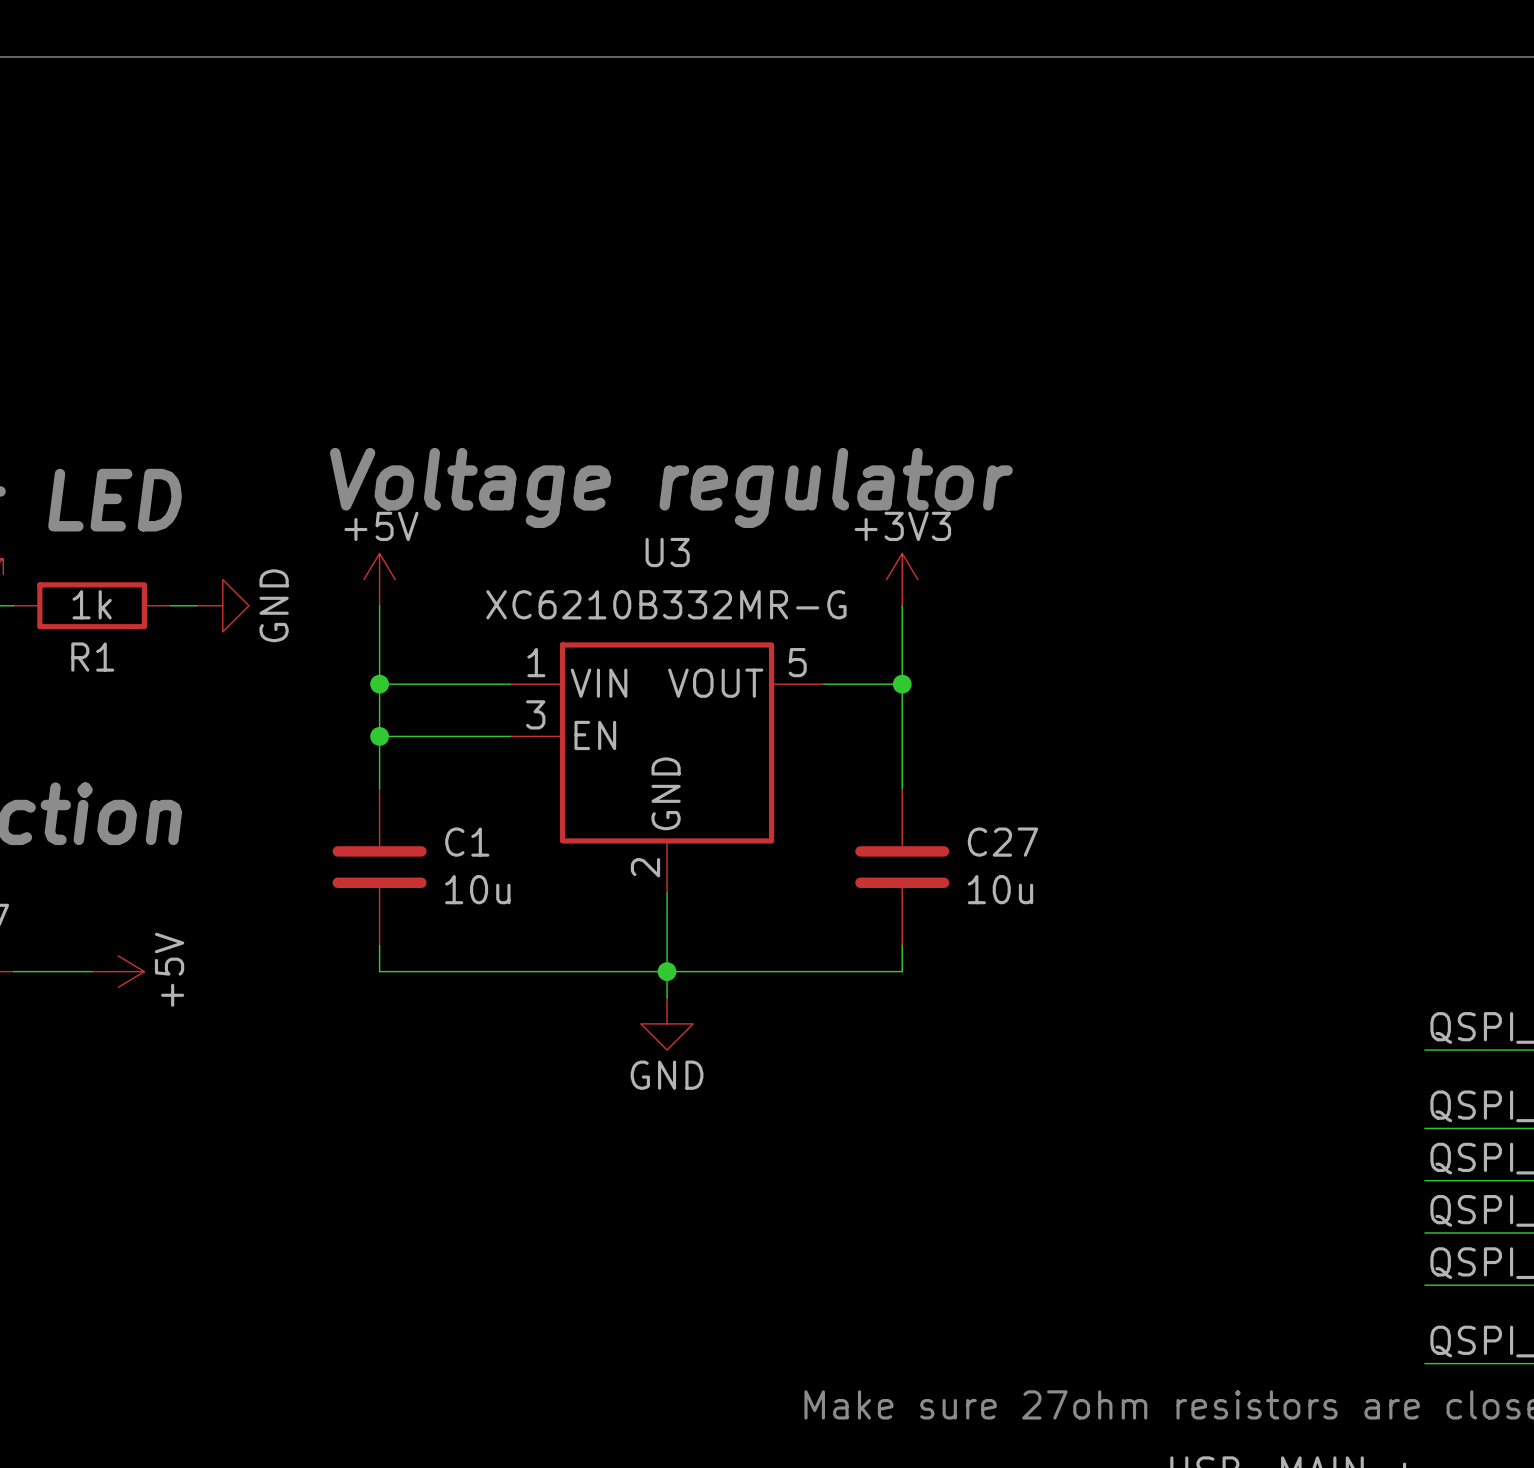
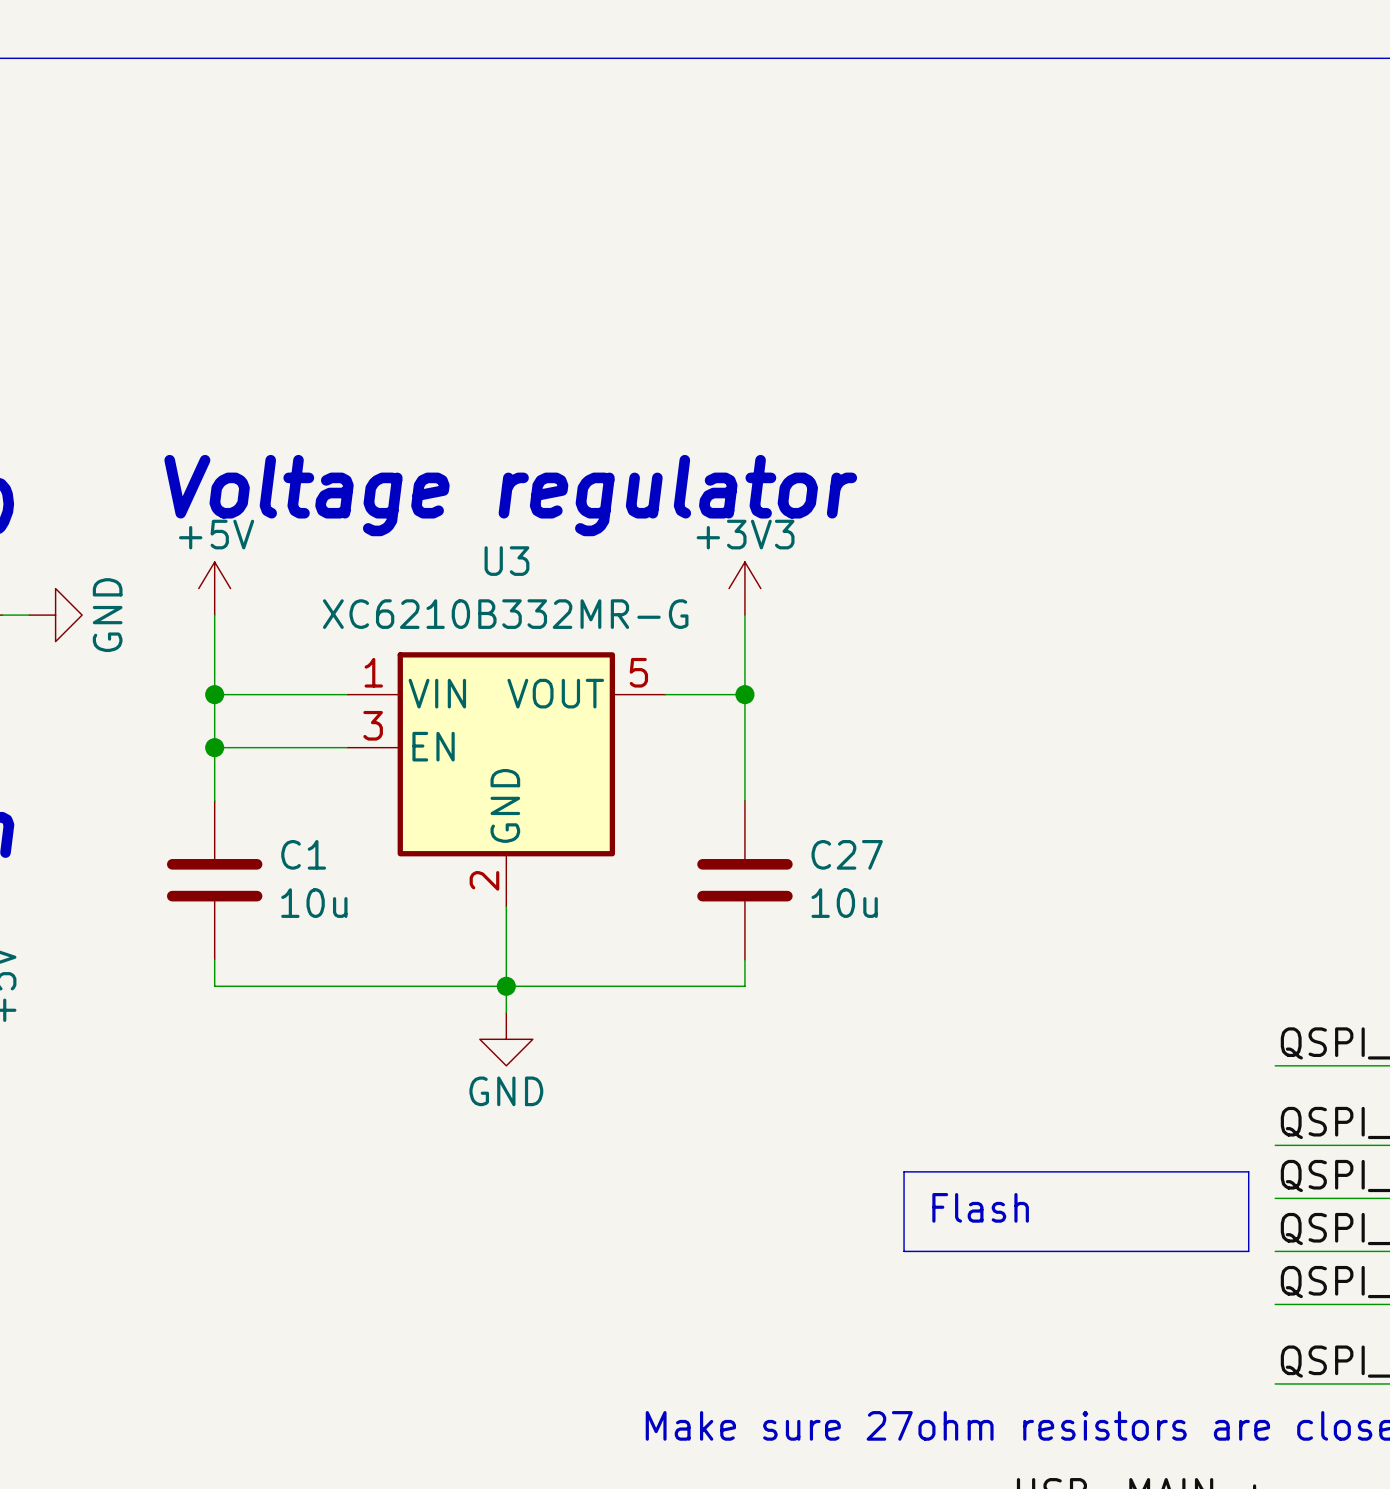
line: none -> (904, 1171) (1248, 1171) (1248, 1251) (904, 1251) (904, 1171)
text: none -> Flash (980, 1207)

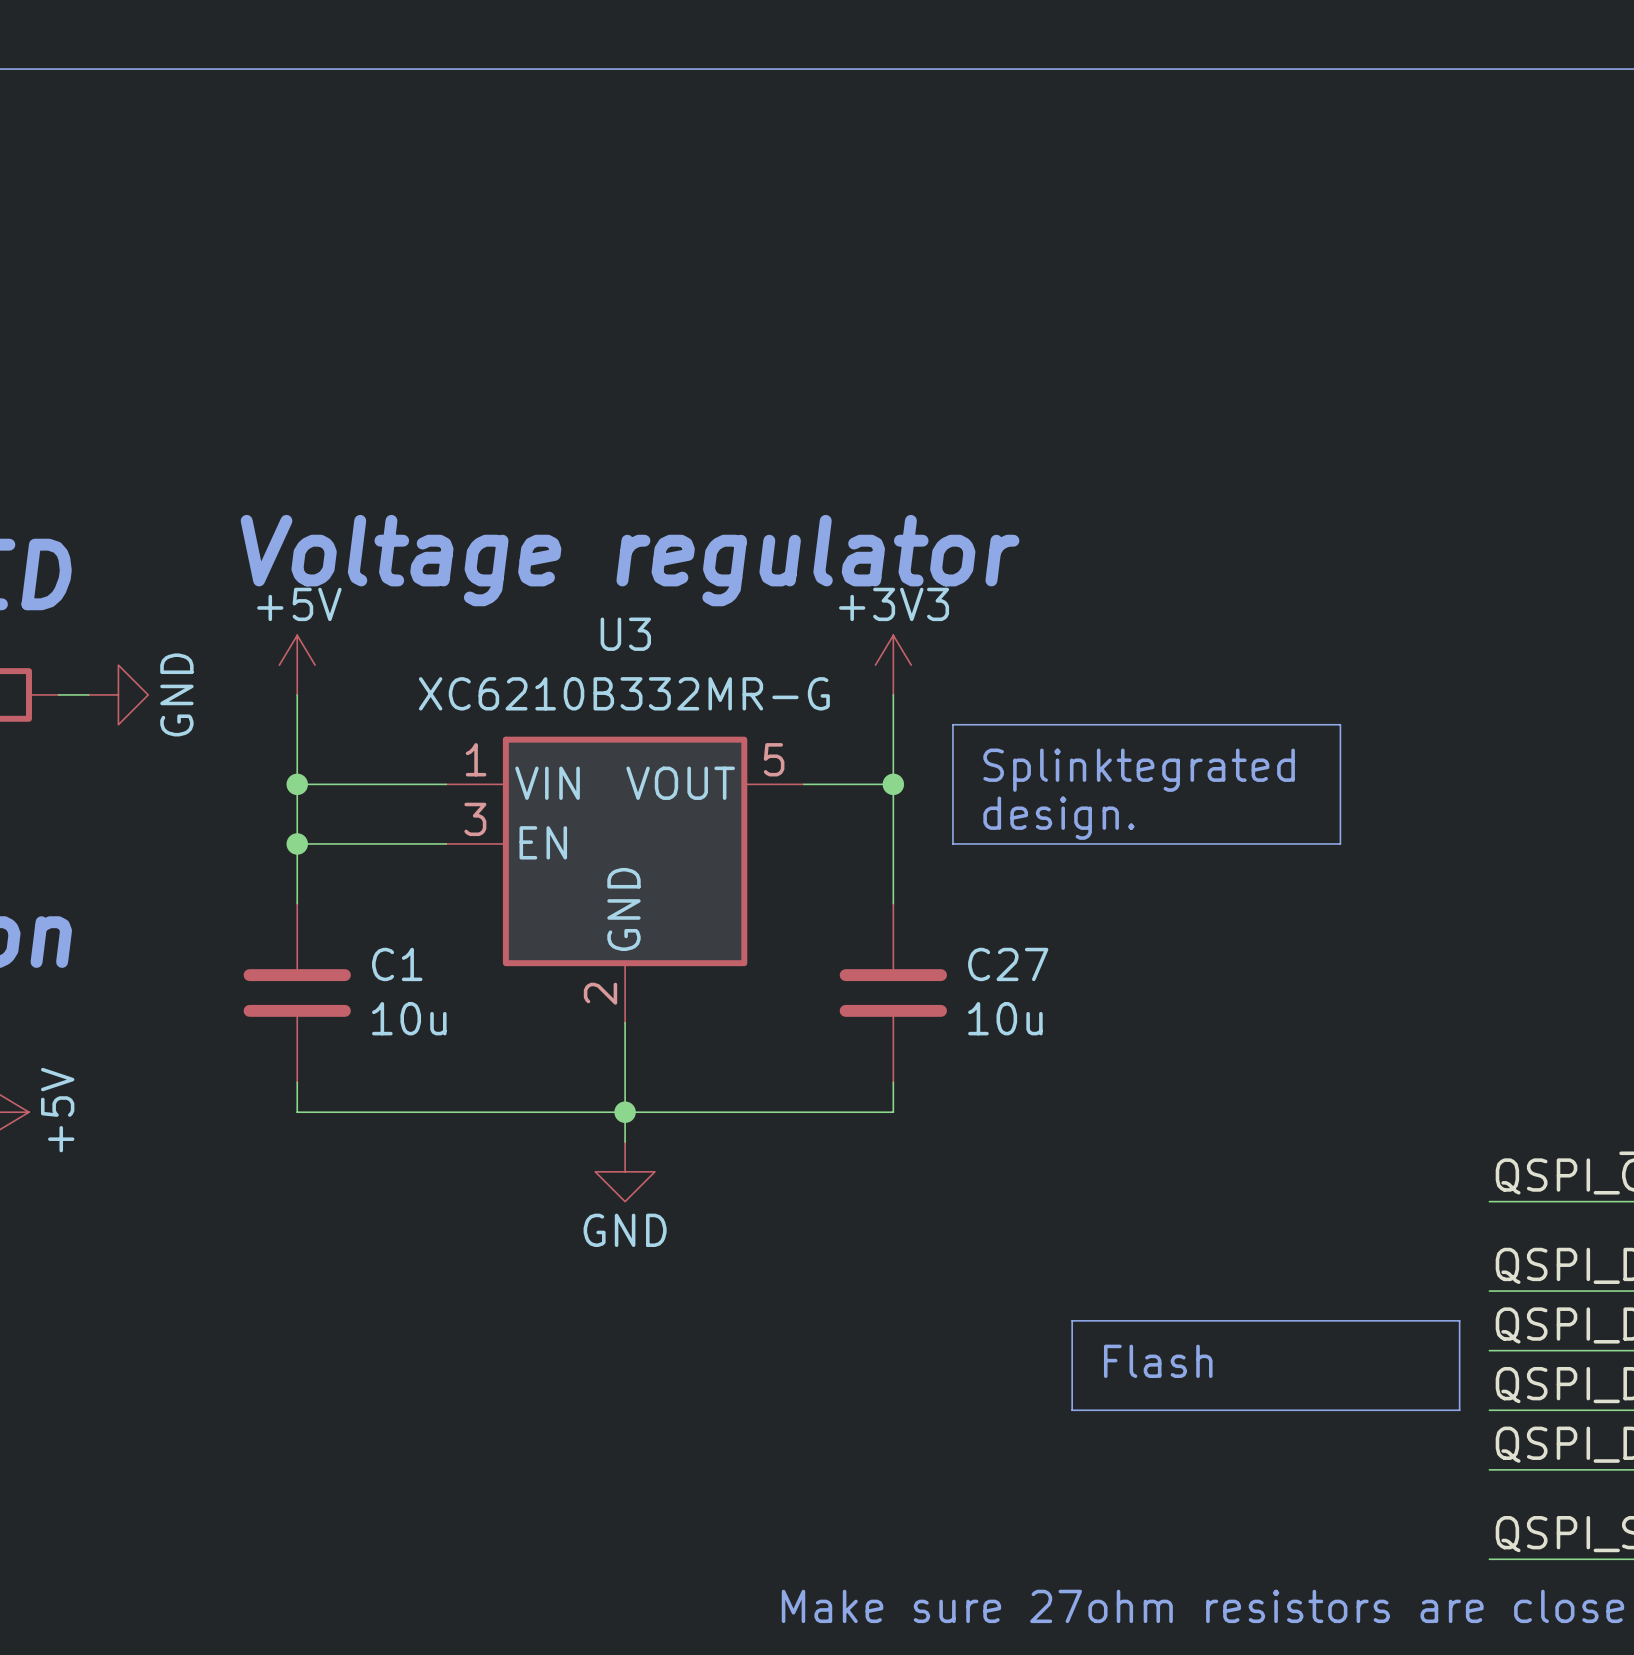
line: none -> (952, 724) (1340, 724) (1340, 843) (952, 843) (952, 724)
text: none -> Splinktegrated (1139, 770)
text: none -> design. (1058, 818)

